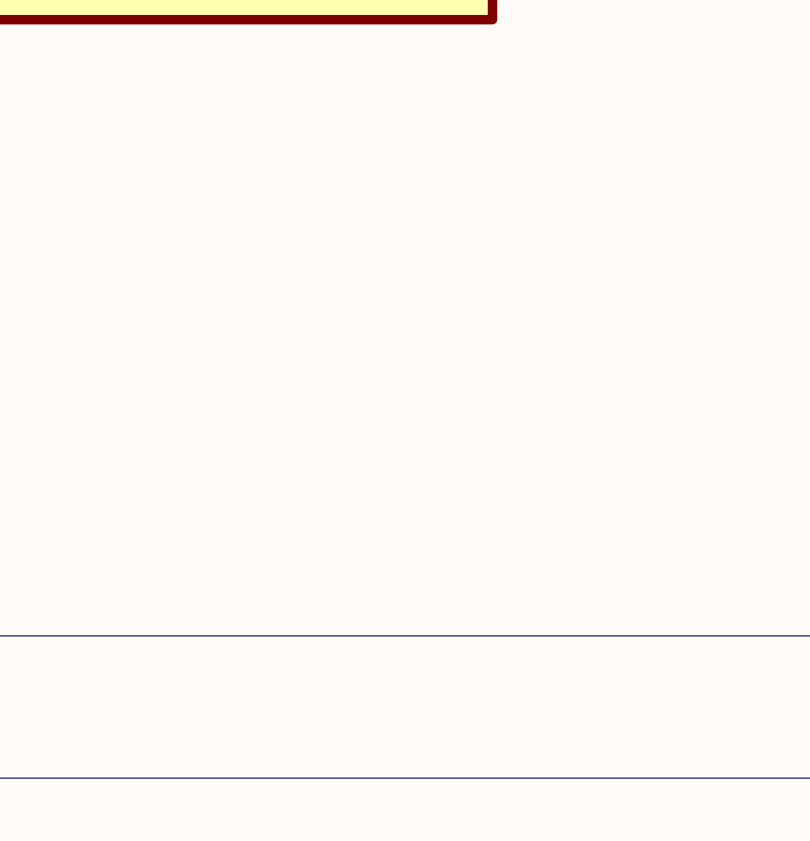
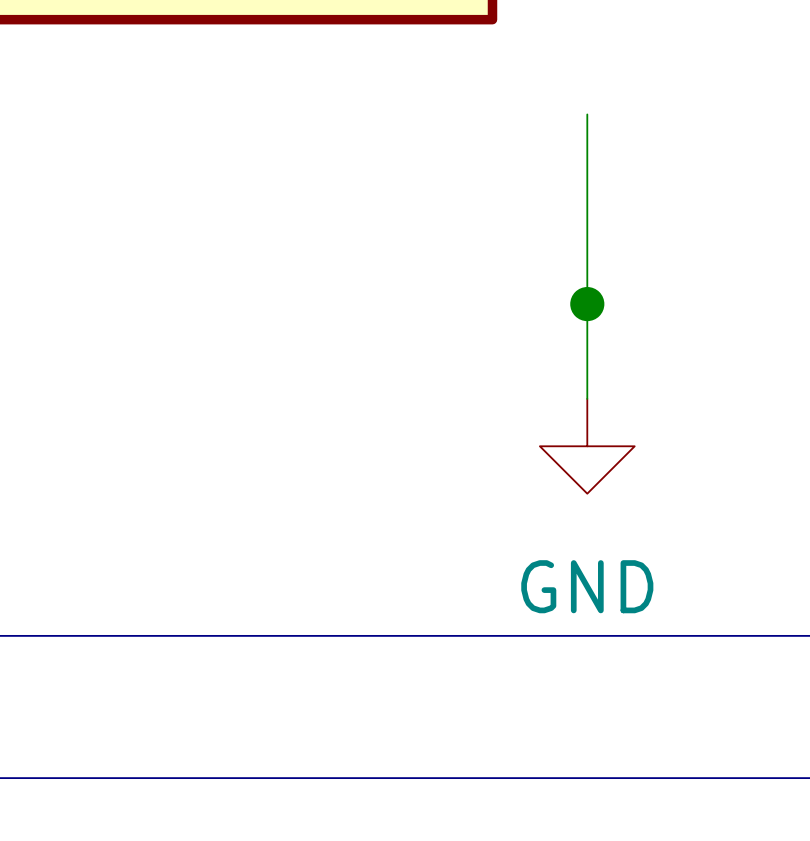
wire: none -> (587, 114) (587, 398)
junction: none -> (587, 304)
power symbol: none -> GND (587, 446)

